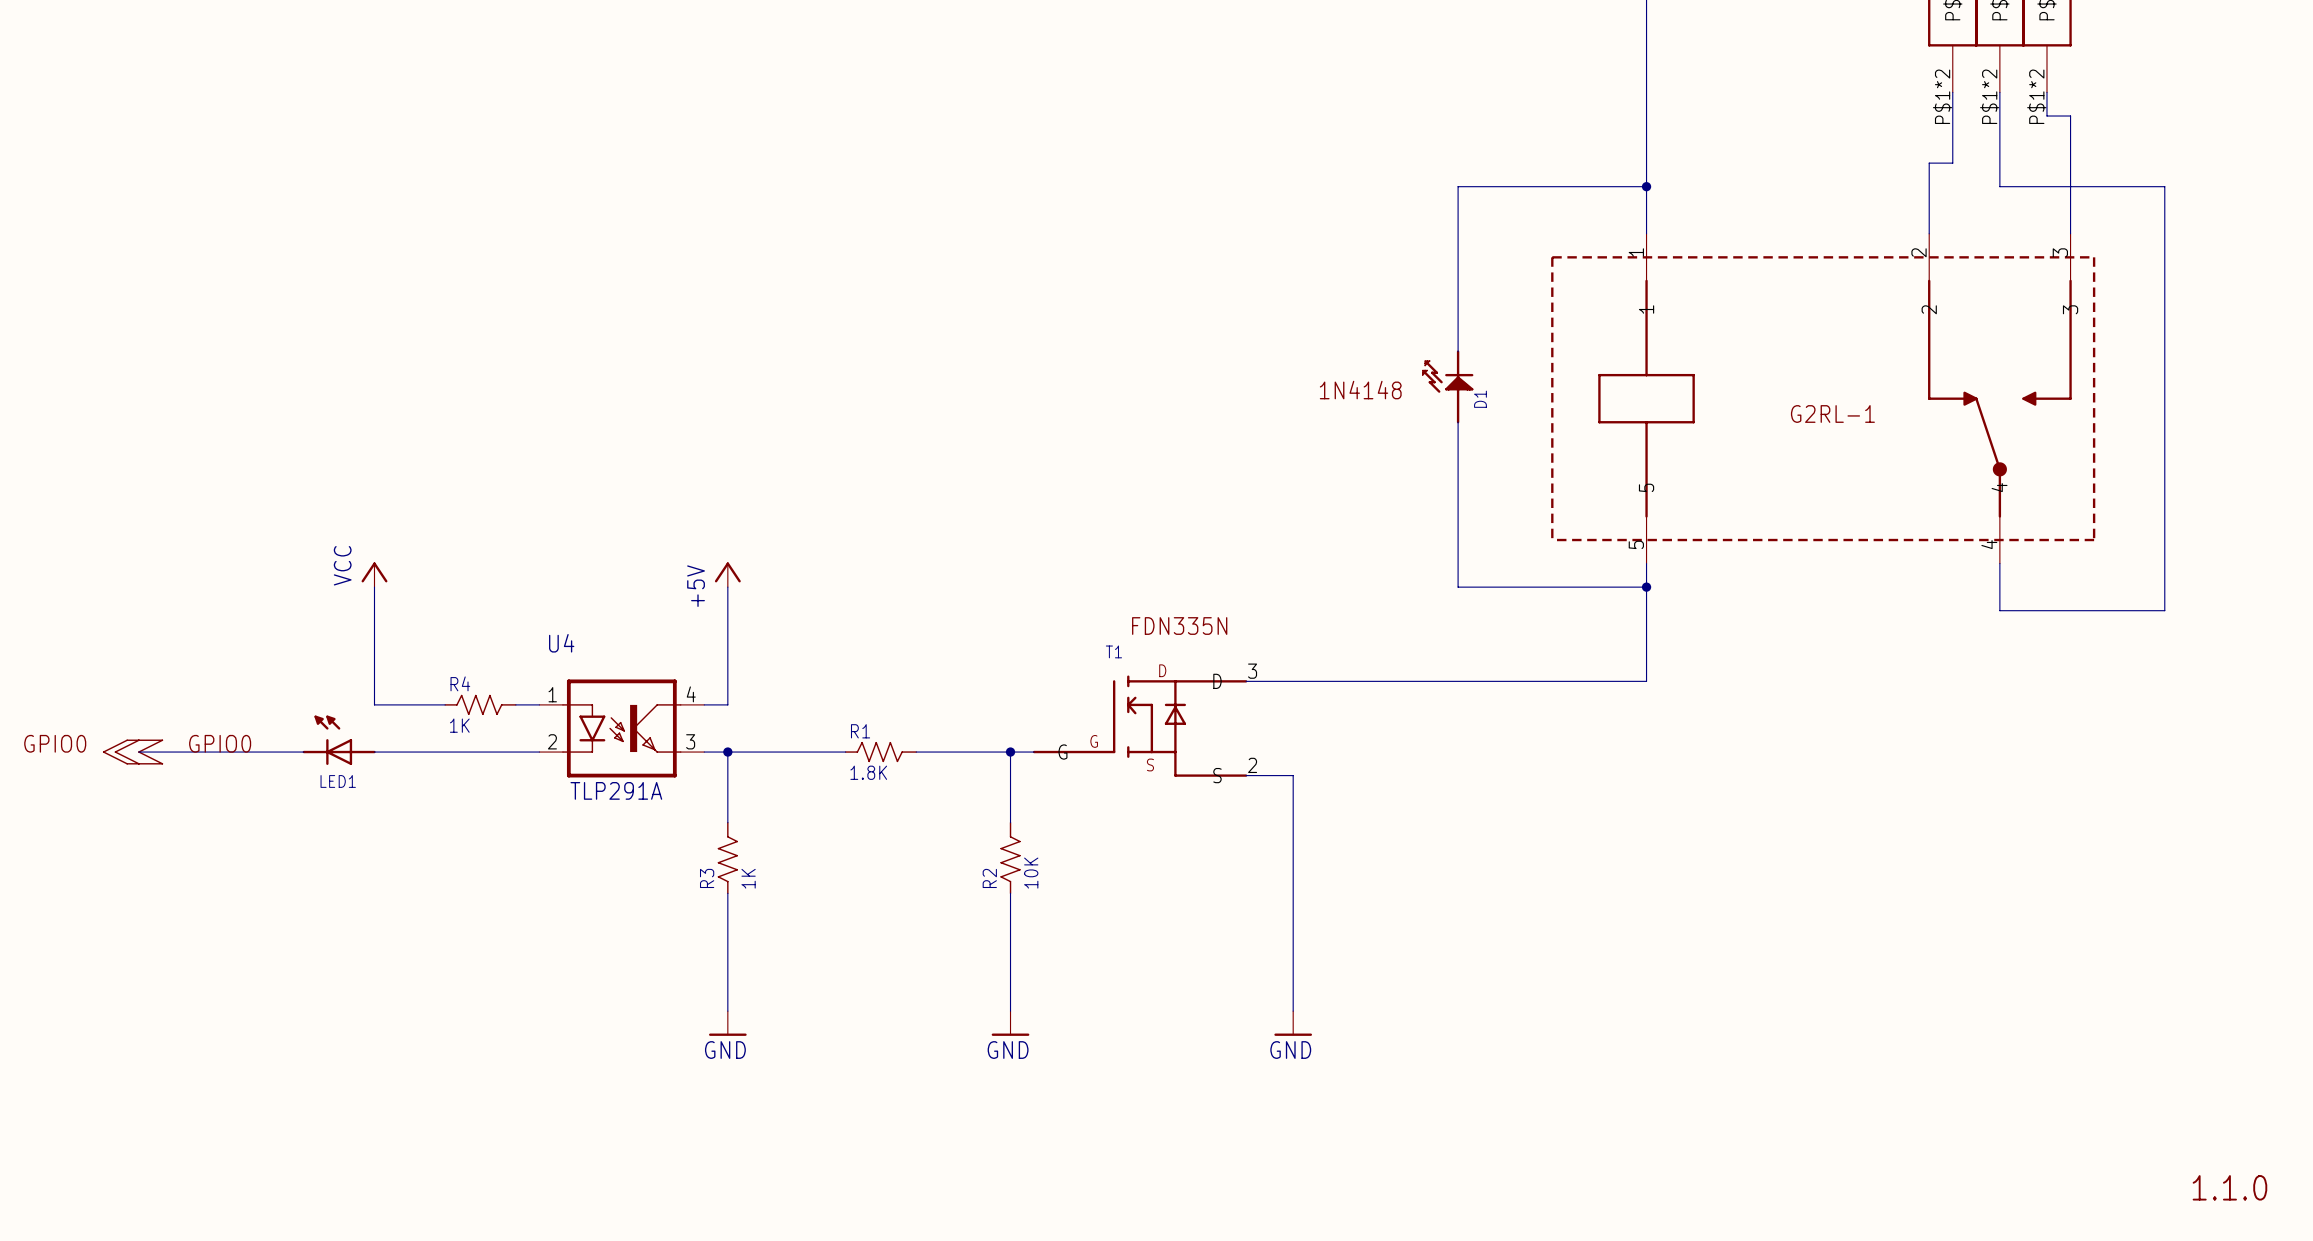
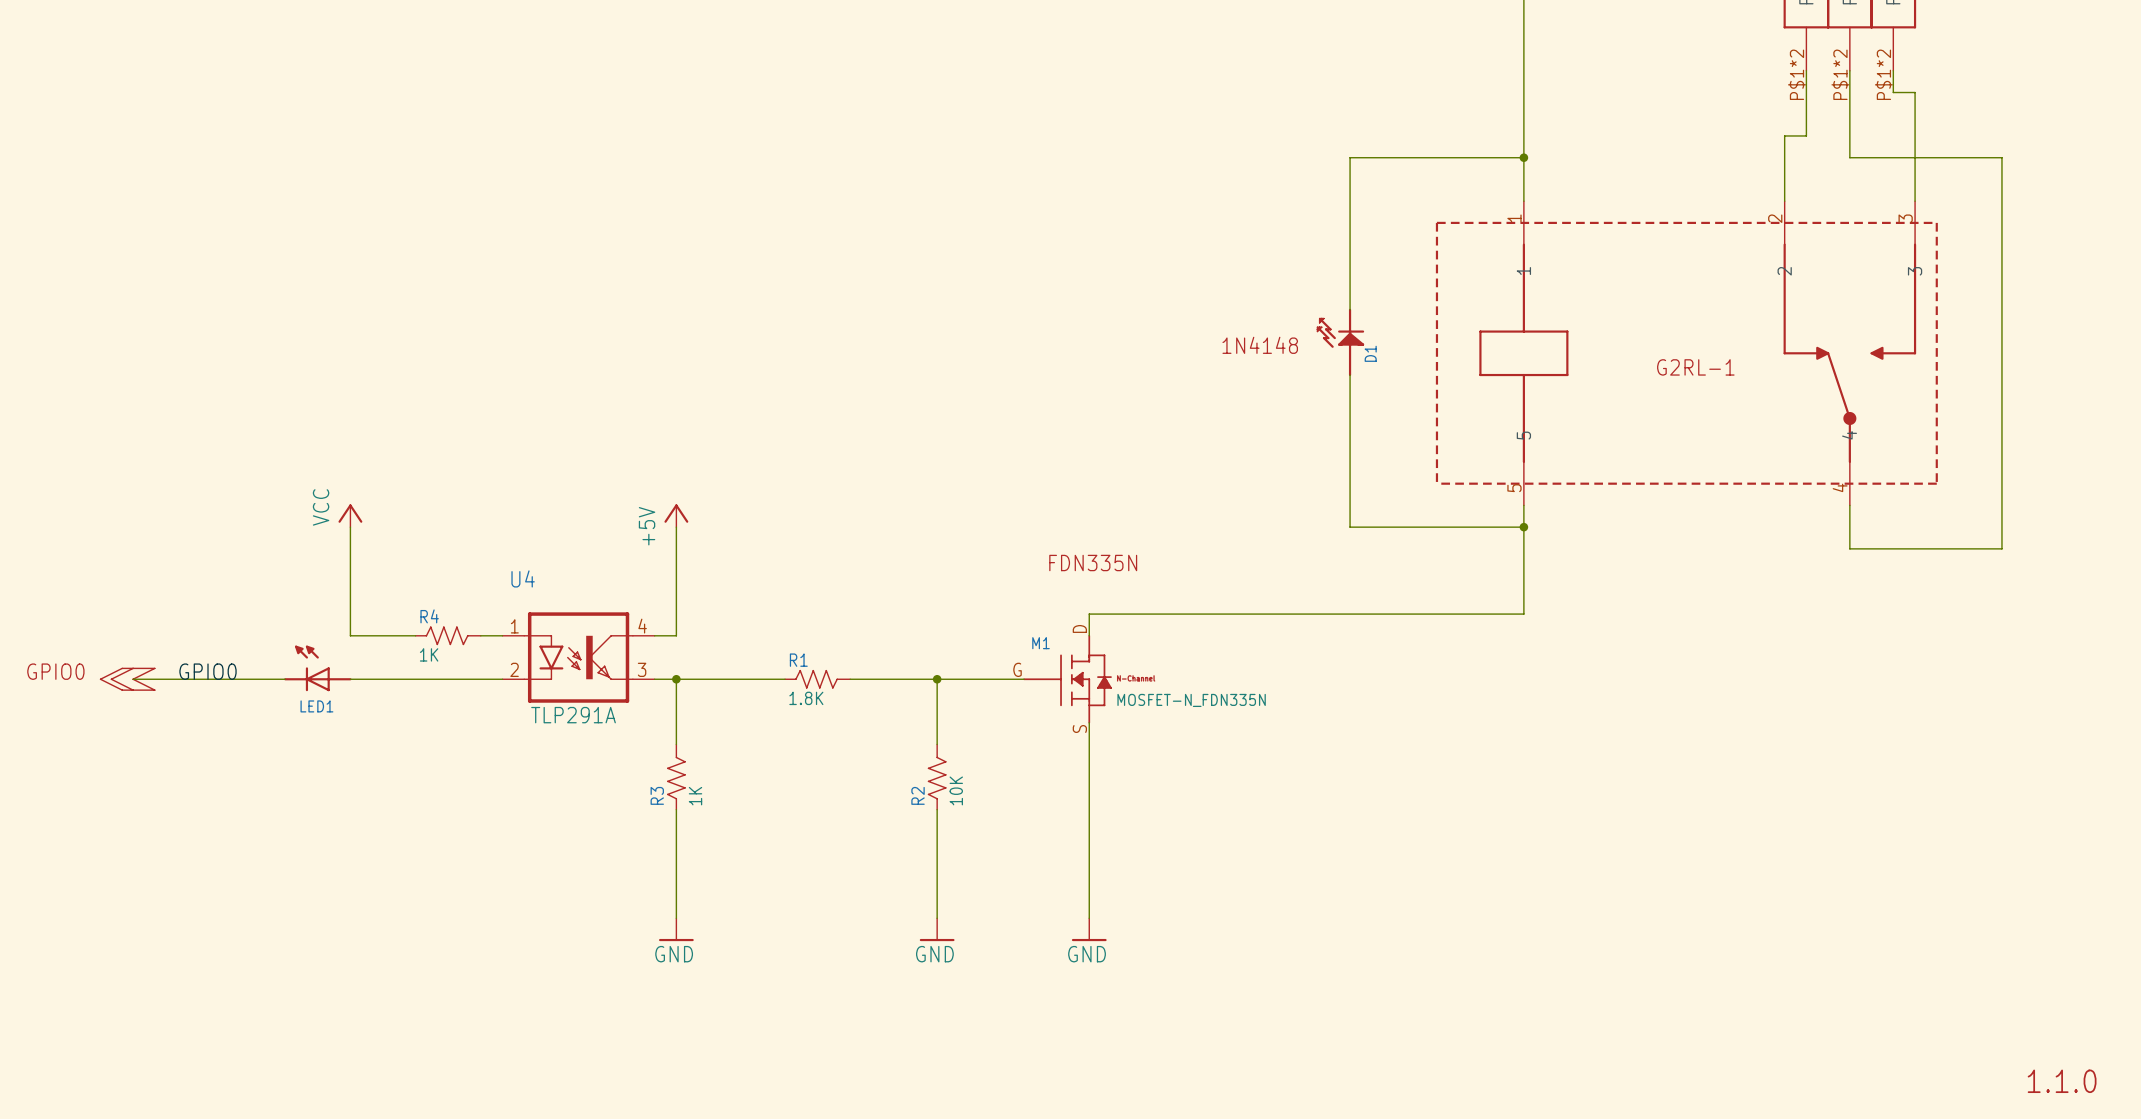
T1: (1140, 726) -> none
M1: none -> MOSFET-N_FDN335N (1067, 679)
wire: (1246, 775) (1293, 775) (1293, 1011) -> none
wire: none -> (1089, 722) (1089, 918)
power symbol position: GND (1293, 1023) -> GND (1089, 929)

